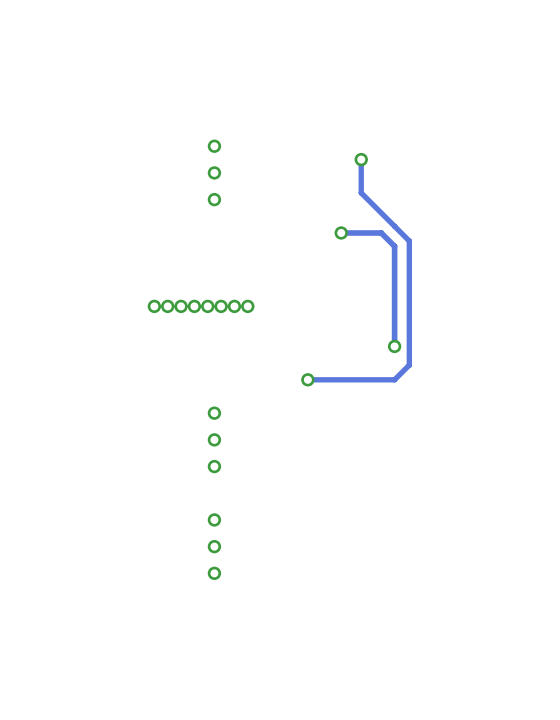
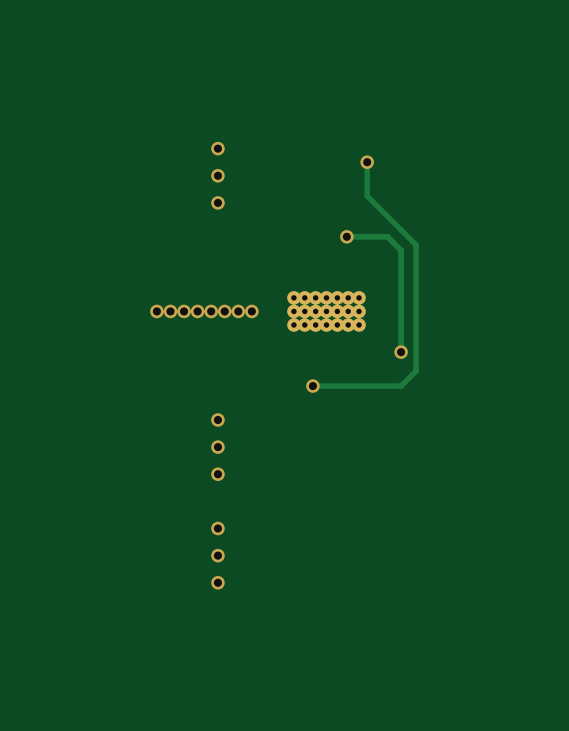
part: none -> (326, 311)

